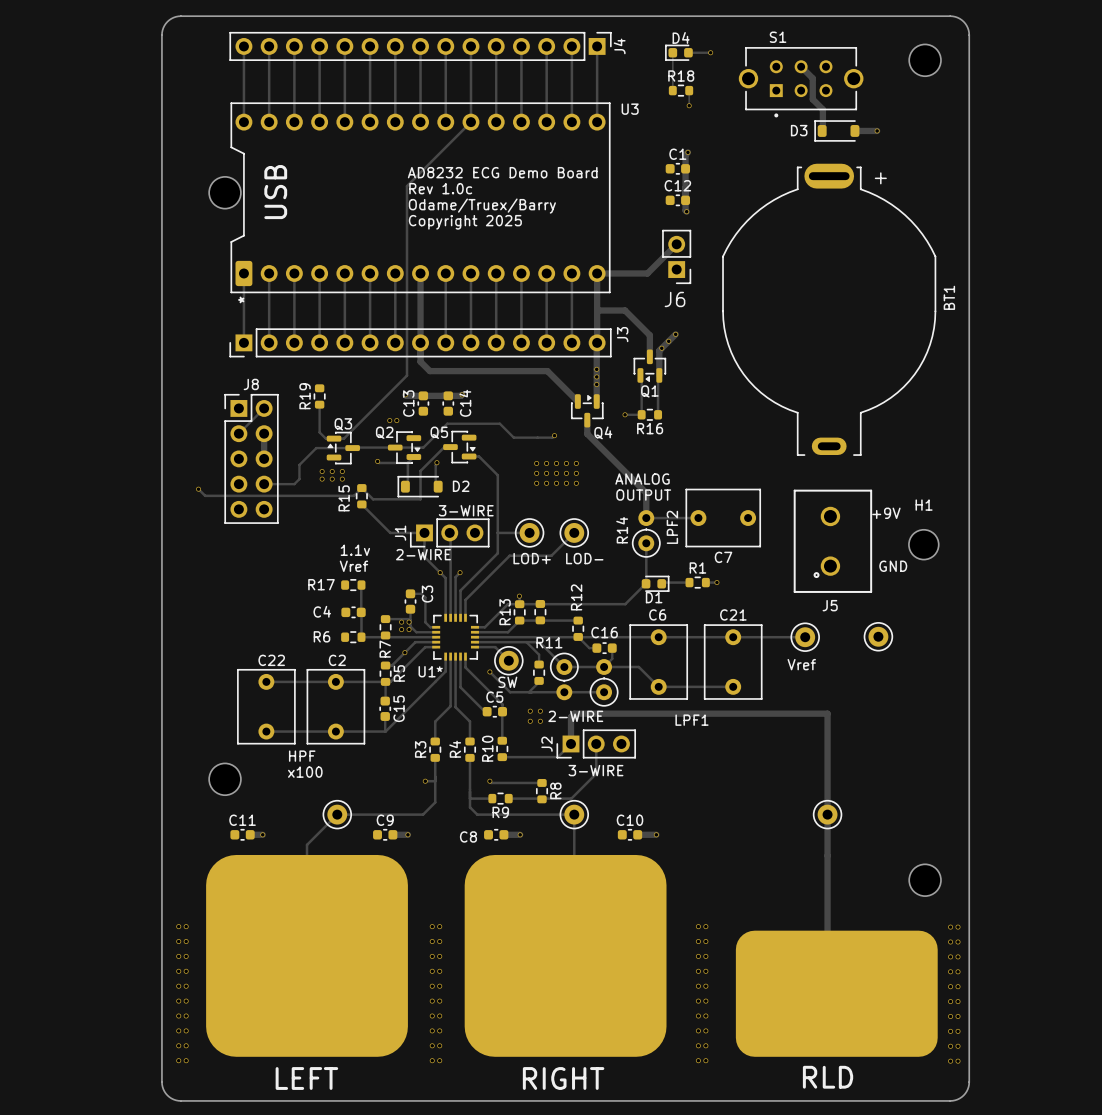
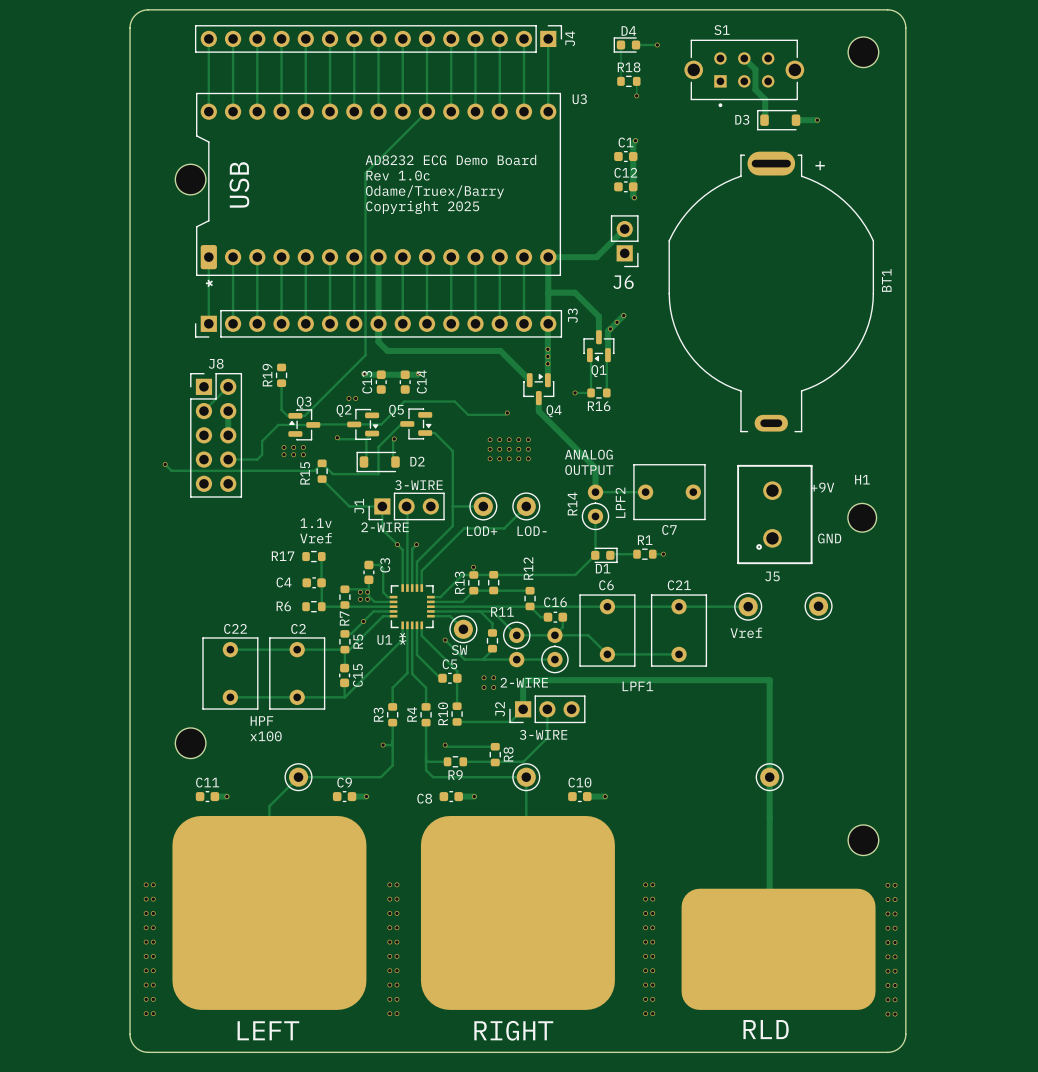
U1 text rotation: 0° (439, 669) -> 180° (402, 636)
U1 text: none -> * (402, 641)

